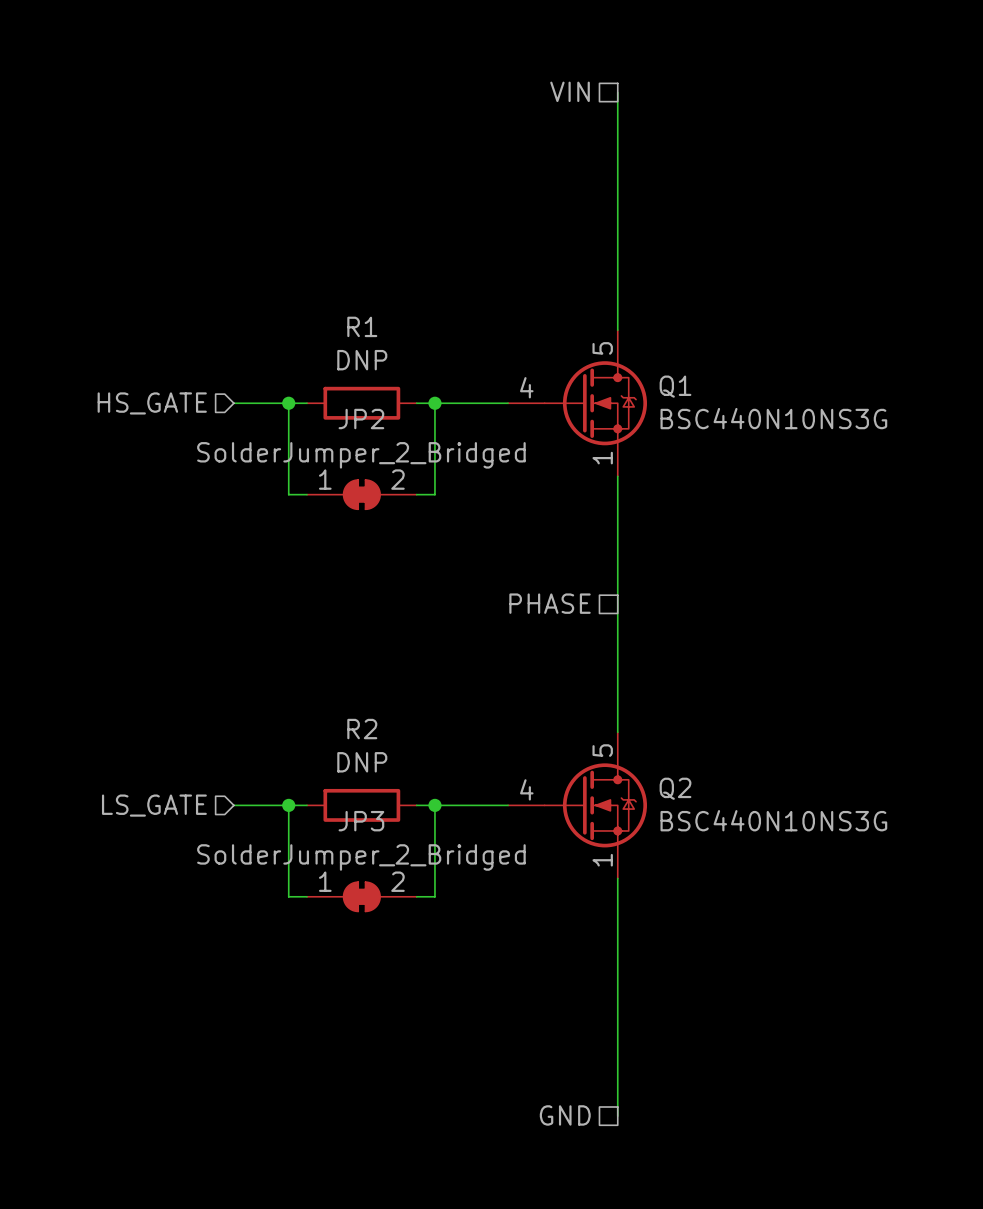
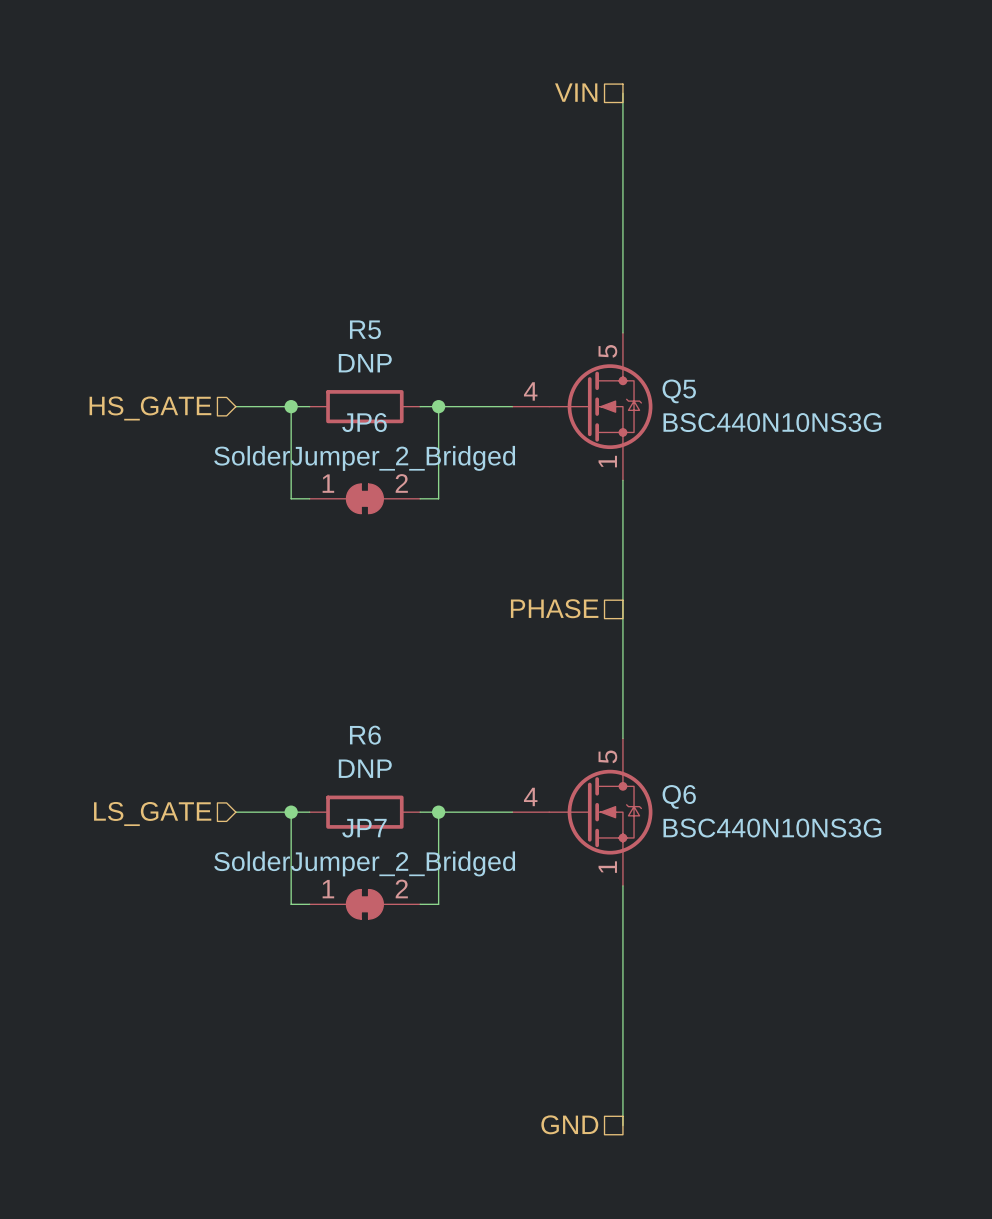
R1 name: R1 (362, 326) -> R5 (365, 329)
Q1 name: Q1 (675, 386) -> Q5 (679, 391)
JP2 name: JP2 (361, 419) -> JP6 (364, 422)
R2 name: R2 (362, 729) -> R6 (365, 735)
Q2 name: Q2 (675, 788) -> Q6 (679, 796)
JP3 name: JP3 (361, 821) -> JP7 (364, 828)

